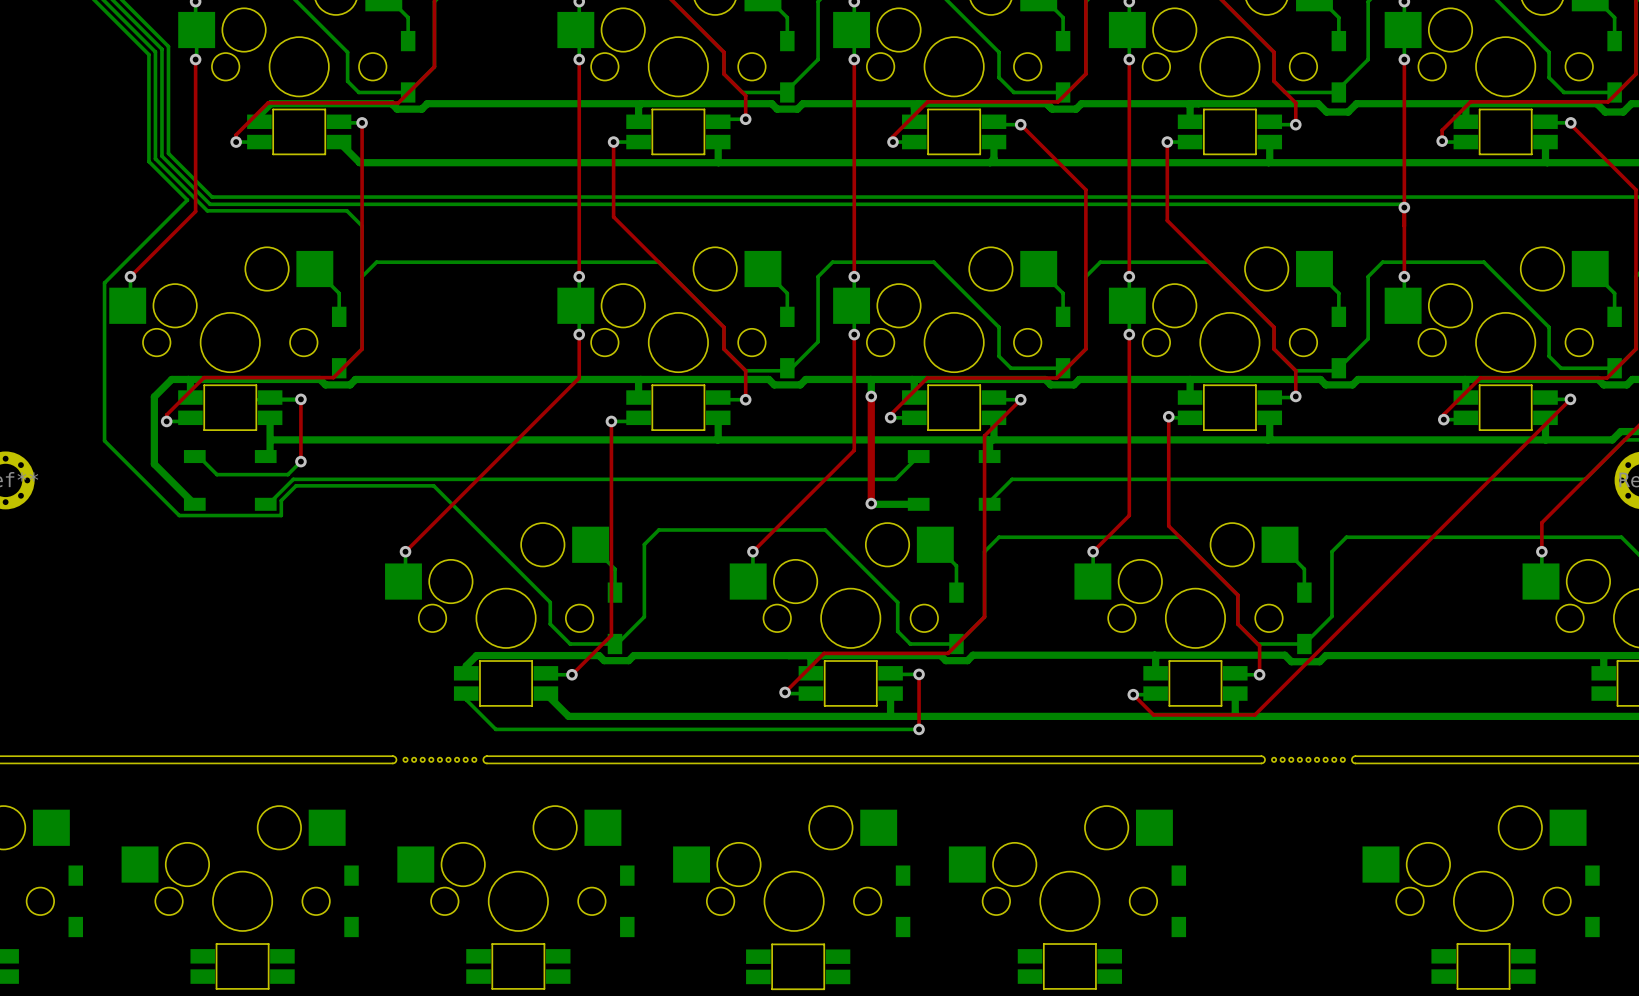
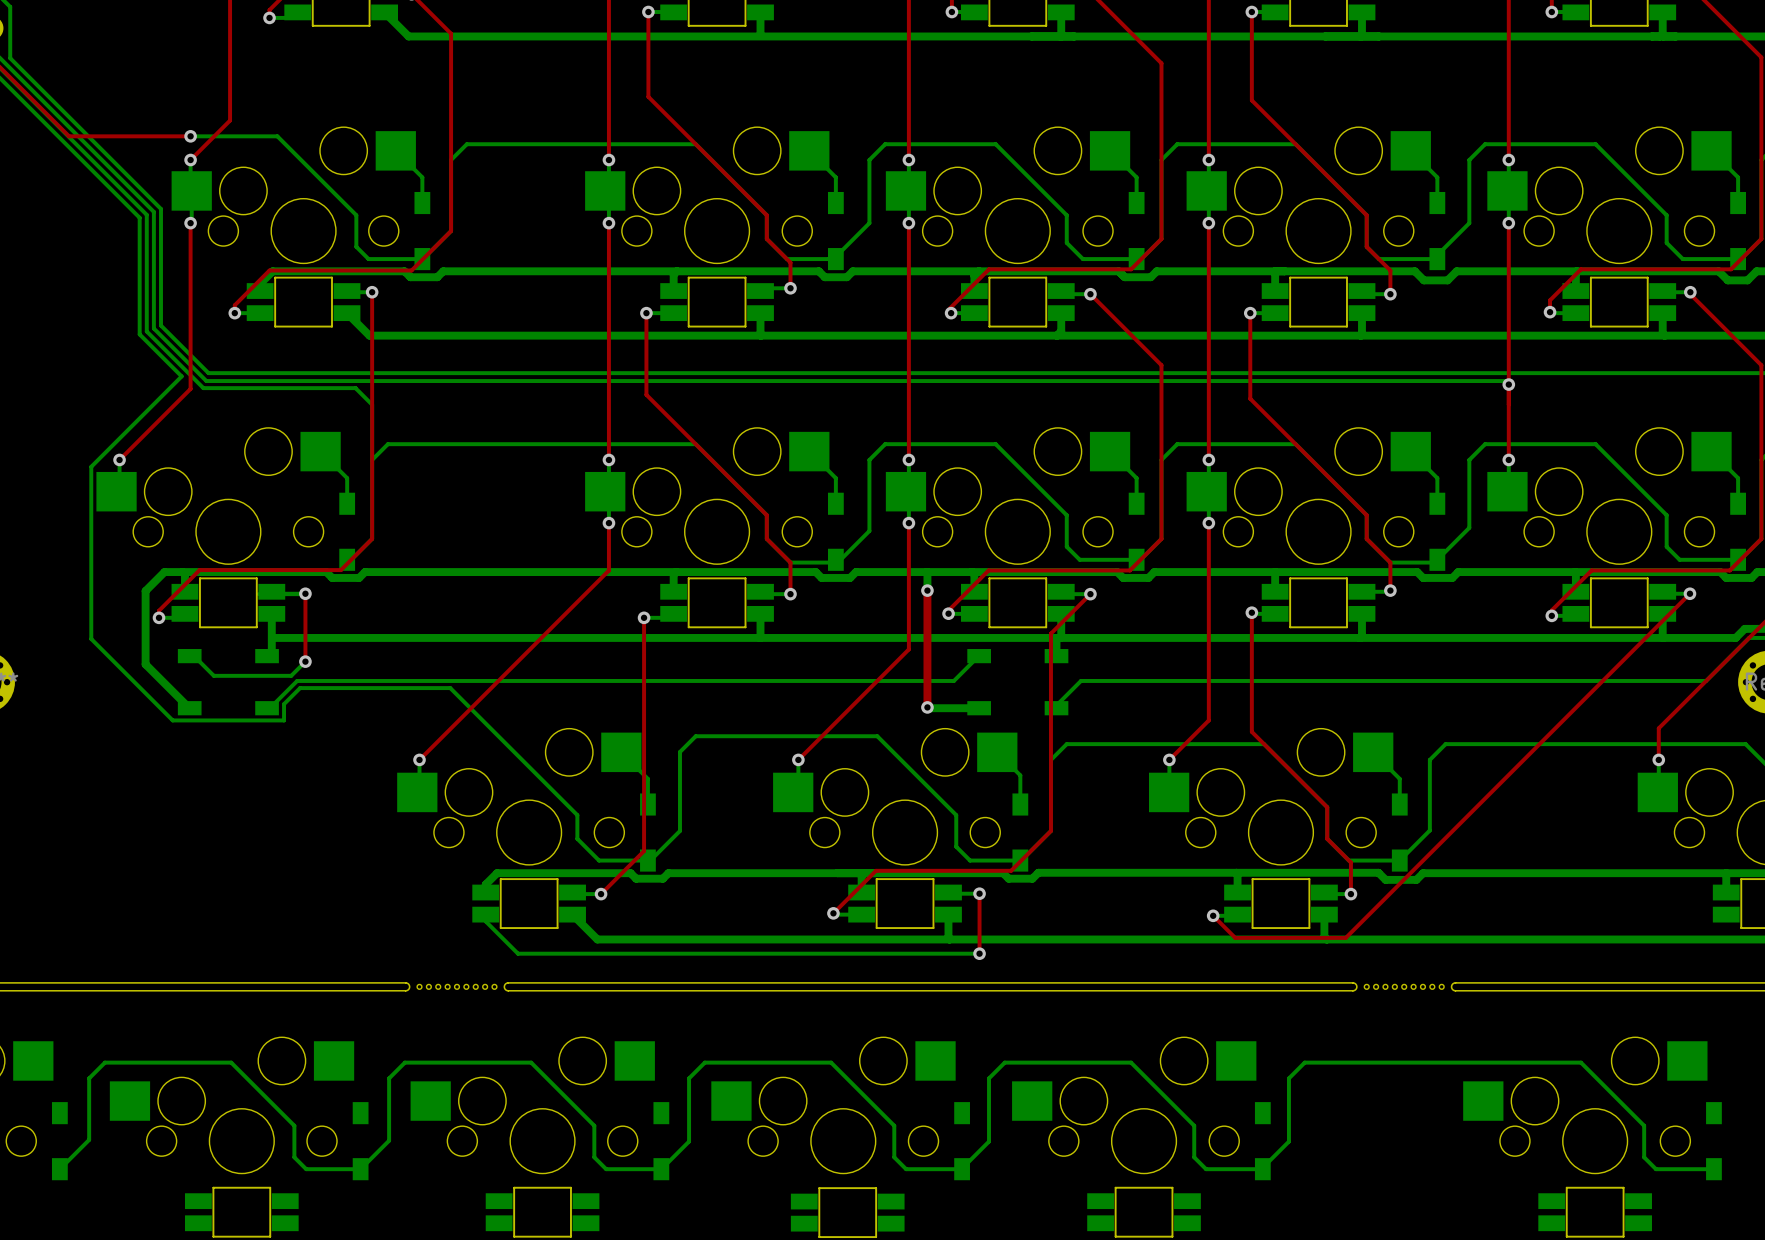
bottom track: none -> (59, 1169) (89, 1139) (89, 1078) (104, 1062) (231, 1062) (294, 1125) (294, 1157) (306, 1169) (360, 1169) (389, 1140) (389, 1078) (404, 1062) (531, 1062) (594, 1125) (594, 1157) (606, 1169) (661, 1169) (689, 1141) (689, 1078) (704, 1062) (831, 1062) (894, 1125) (894, 1157) (906, 1169) (962, 1169) (989, 1141) (989, 1078) (1004, 1062) (1131, 1062) (1194, 1125) (1194, 1157) (1206, 1169) (1262, 1169) (1288, 1141) (1288, 1078) (1304, 1062) (1581, 1062) (1644, 1125) (1644, 1157) (1656, 1169) (1713, 1169)

